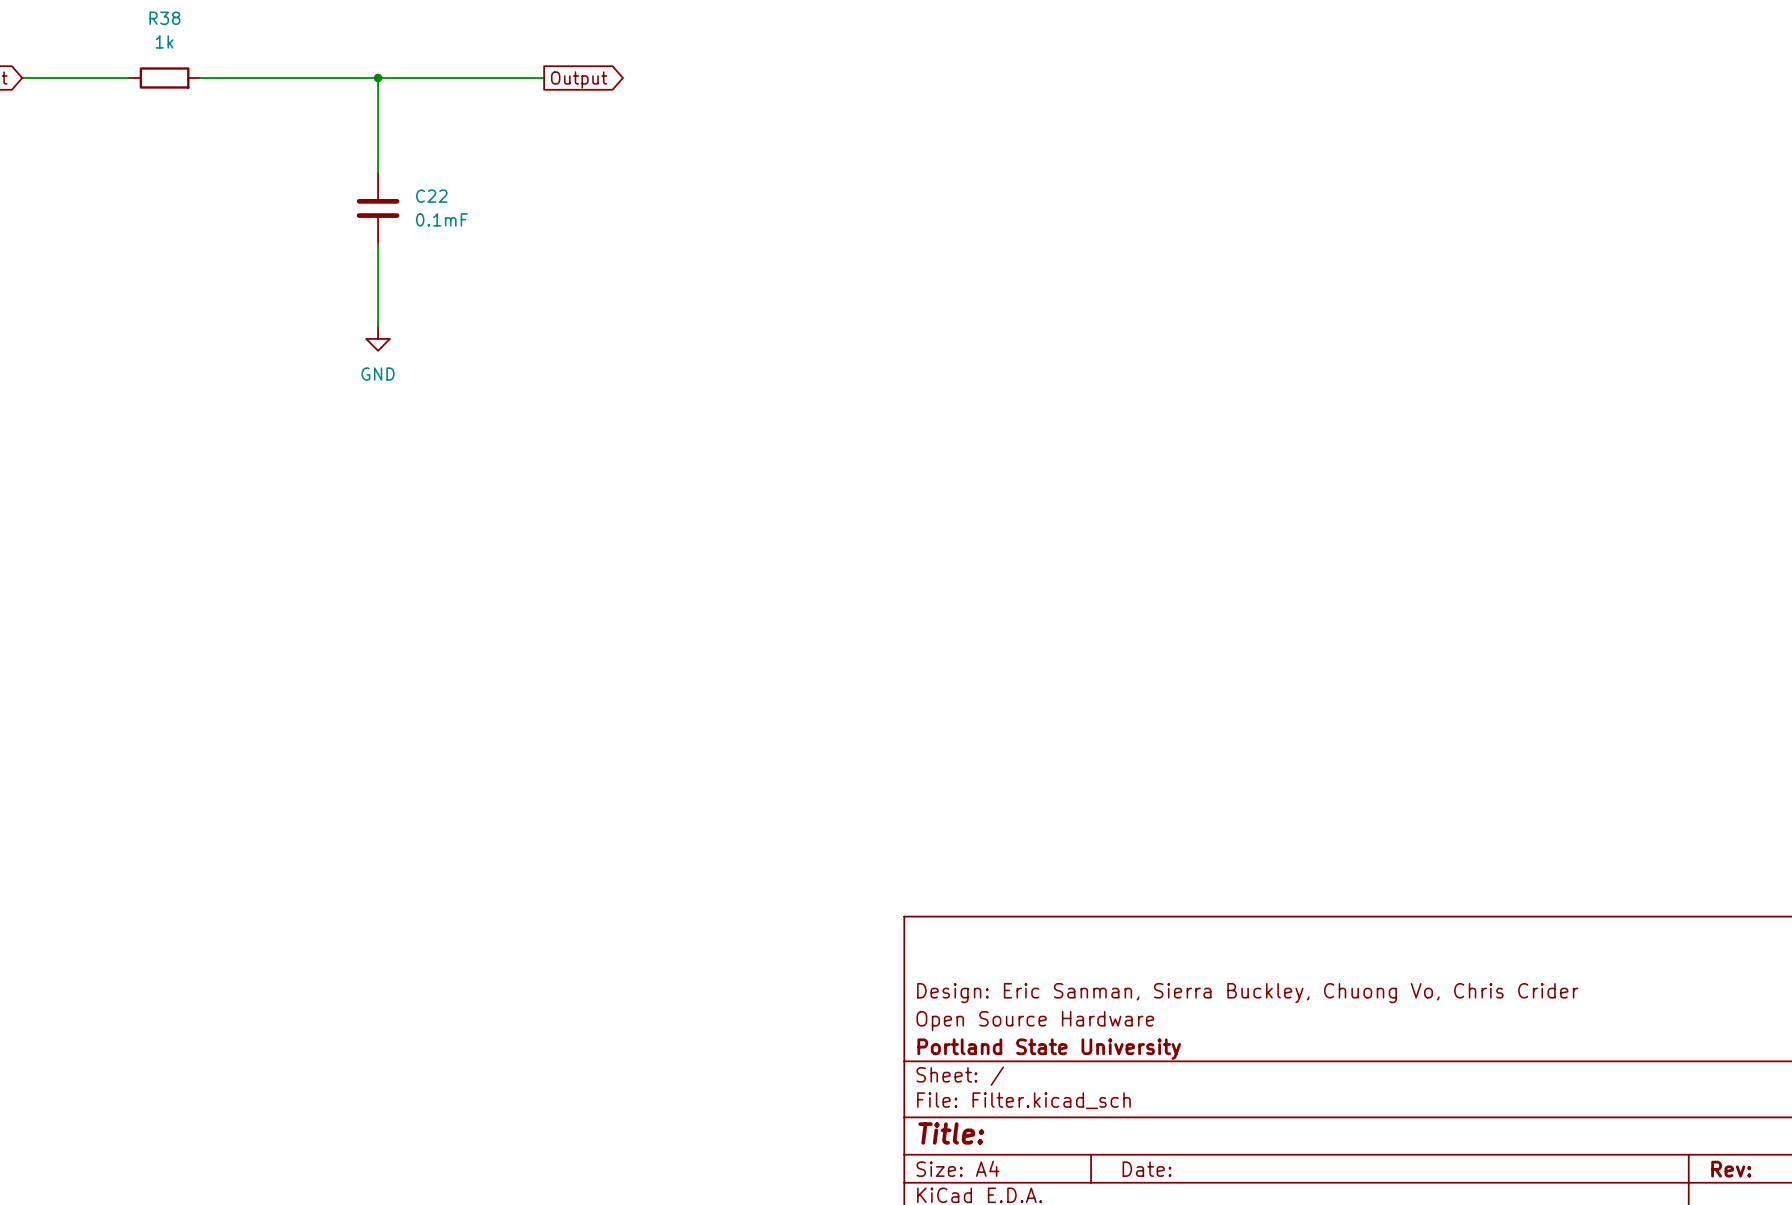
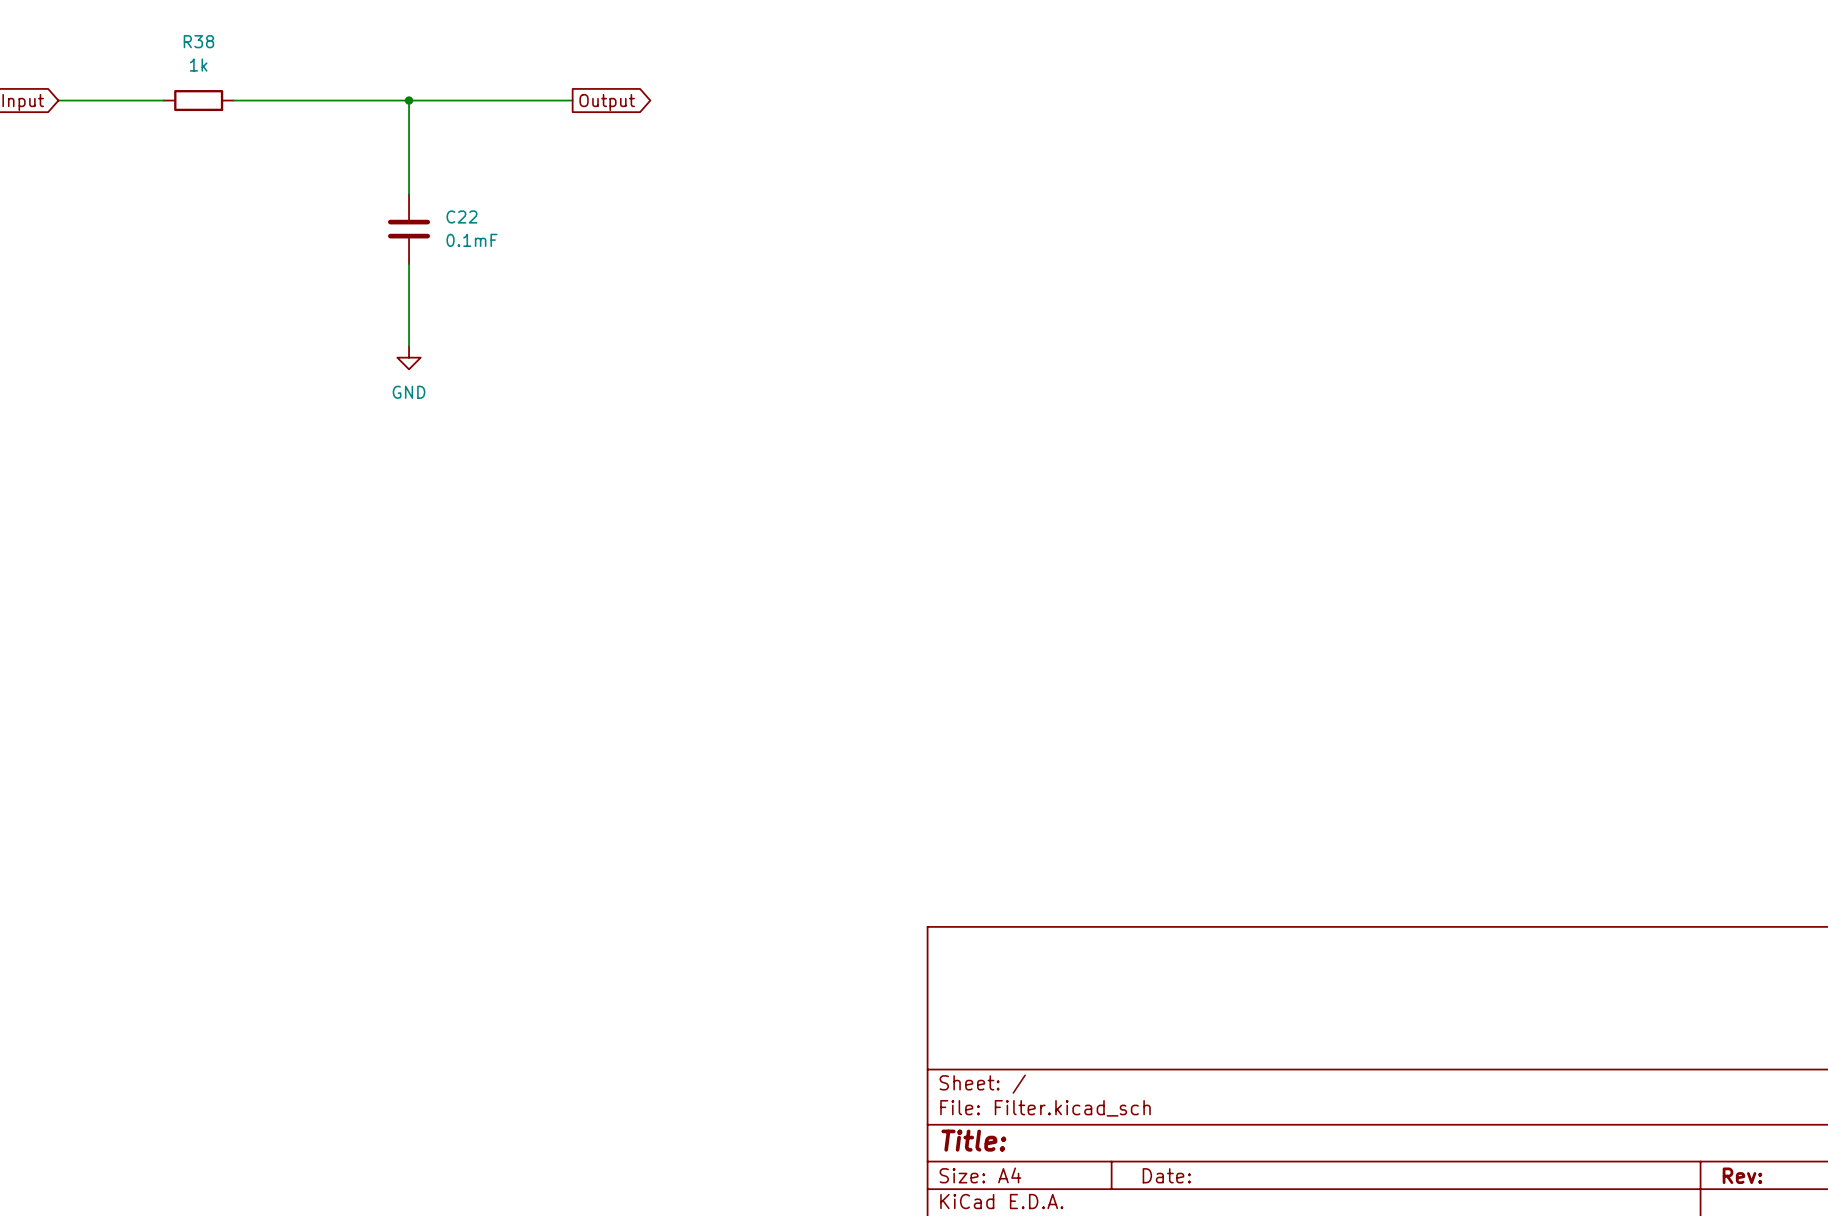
title block: Design: Eric Sanman, Sierra Buckley, Chuong Vo, Chris Crider (1247, 993) -> none
title block: Open Source Hardware (1035, 1021) -> none
title block: Portland State University (1049, 1049) -> none

